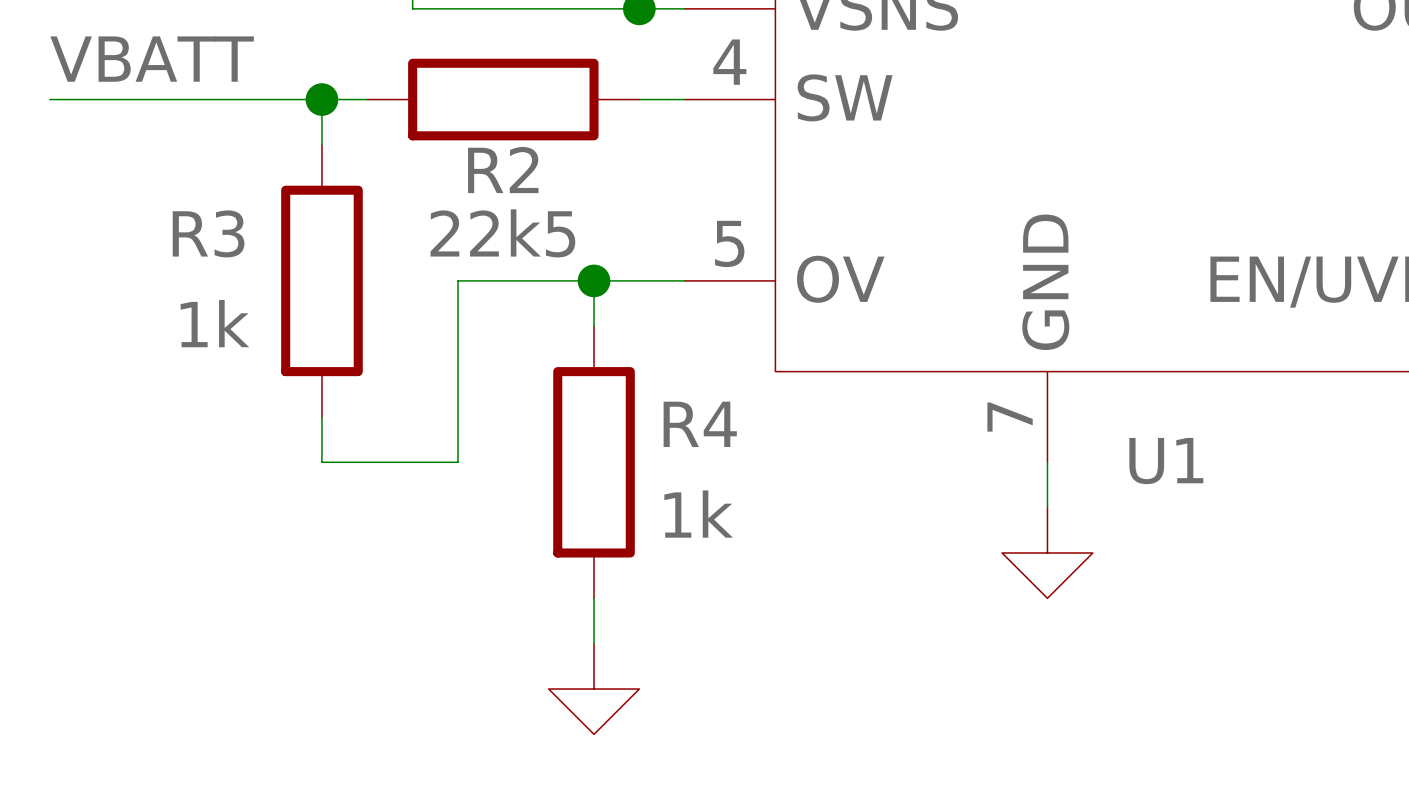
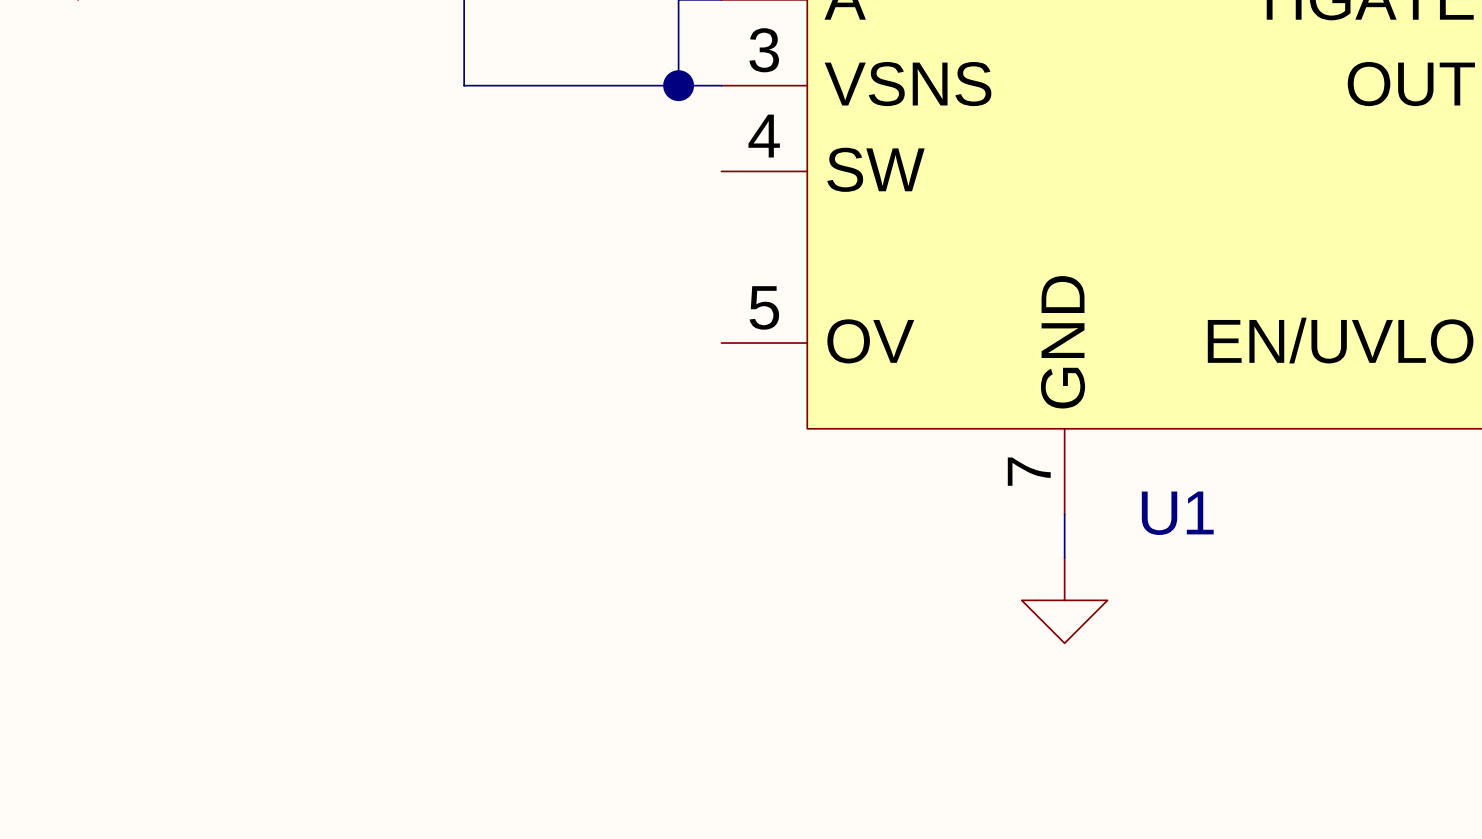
label: VBATT (152, 59) -> none
wire: (49, 99) (367, 99) -> none
wire: (321, 99) (321, 144) -> none
junction: (321, 99) -> none
R2: 22k5 (503, 99) -> none
wire: (639, 99) (684, 99) -> none
R3: 1k (321, 280) -> none
wire: (594, 280) (594, 326) -> none
junction: (594, 280) -> none
wire: (684, 280) (457, 280) (457, 462) (321, 462) (321, 416) -> none
R4: 1k (594, 462) -> none
wire: (594, 598) (594, 643) -> none
power symbol: (594, 689) -> none

